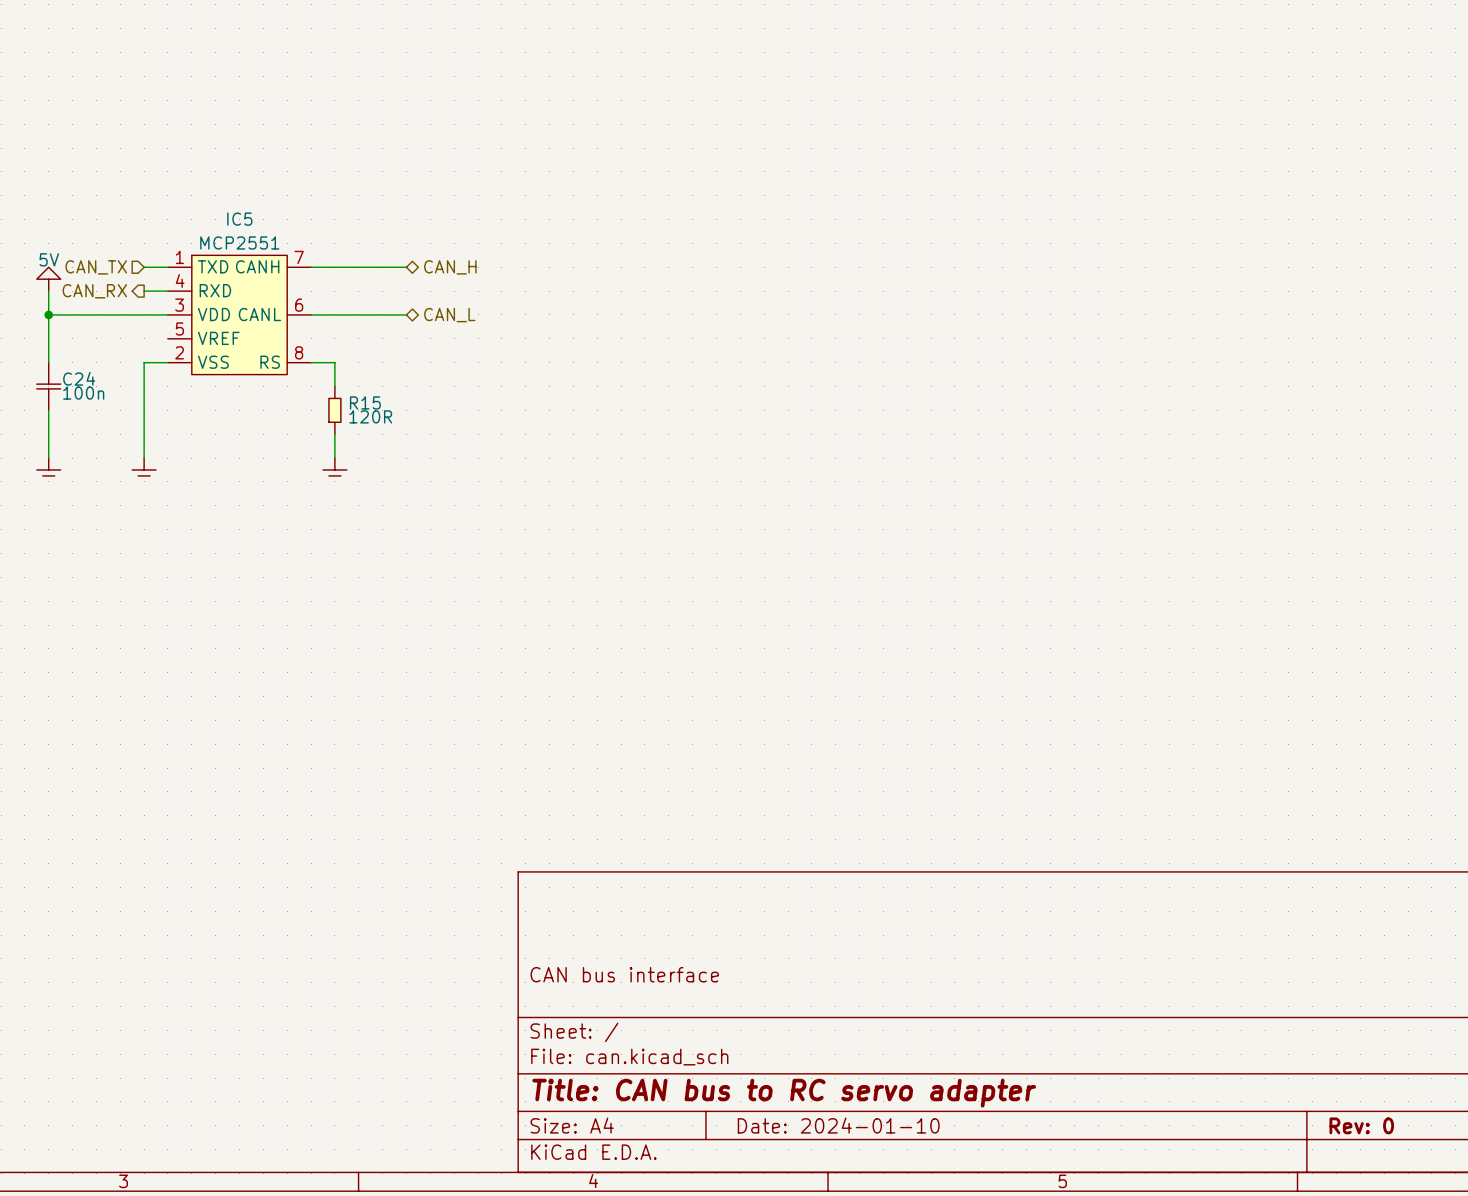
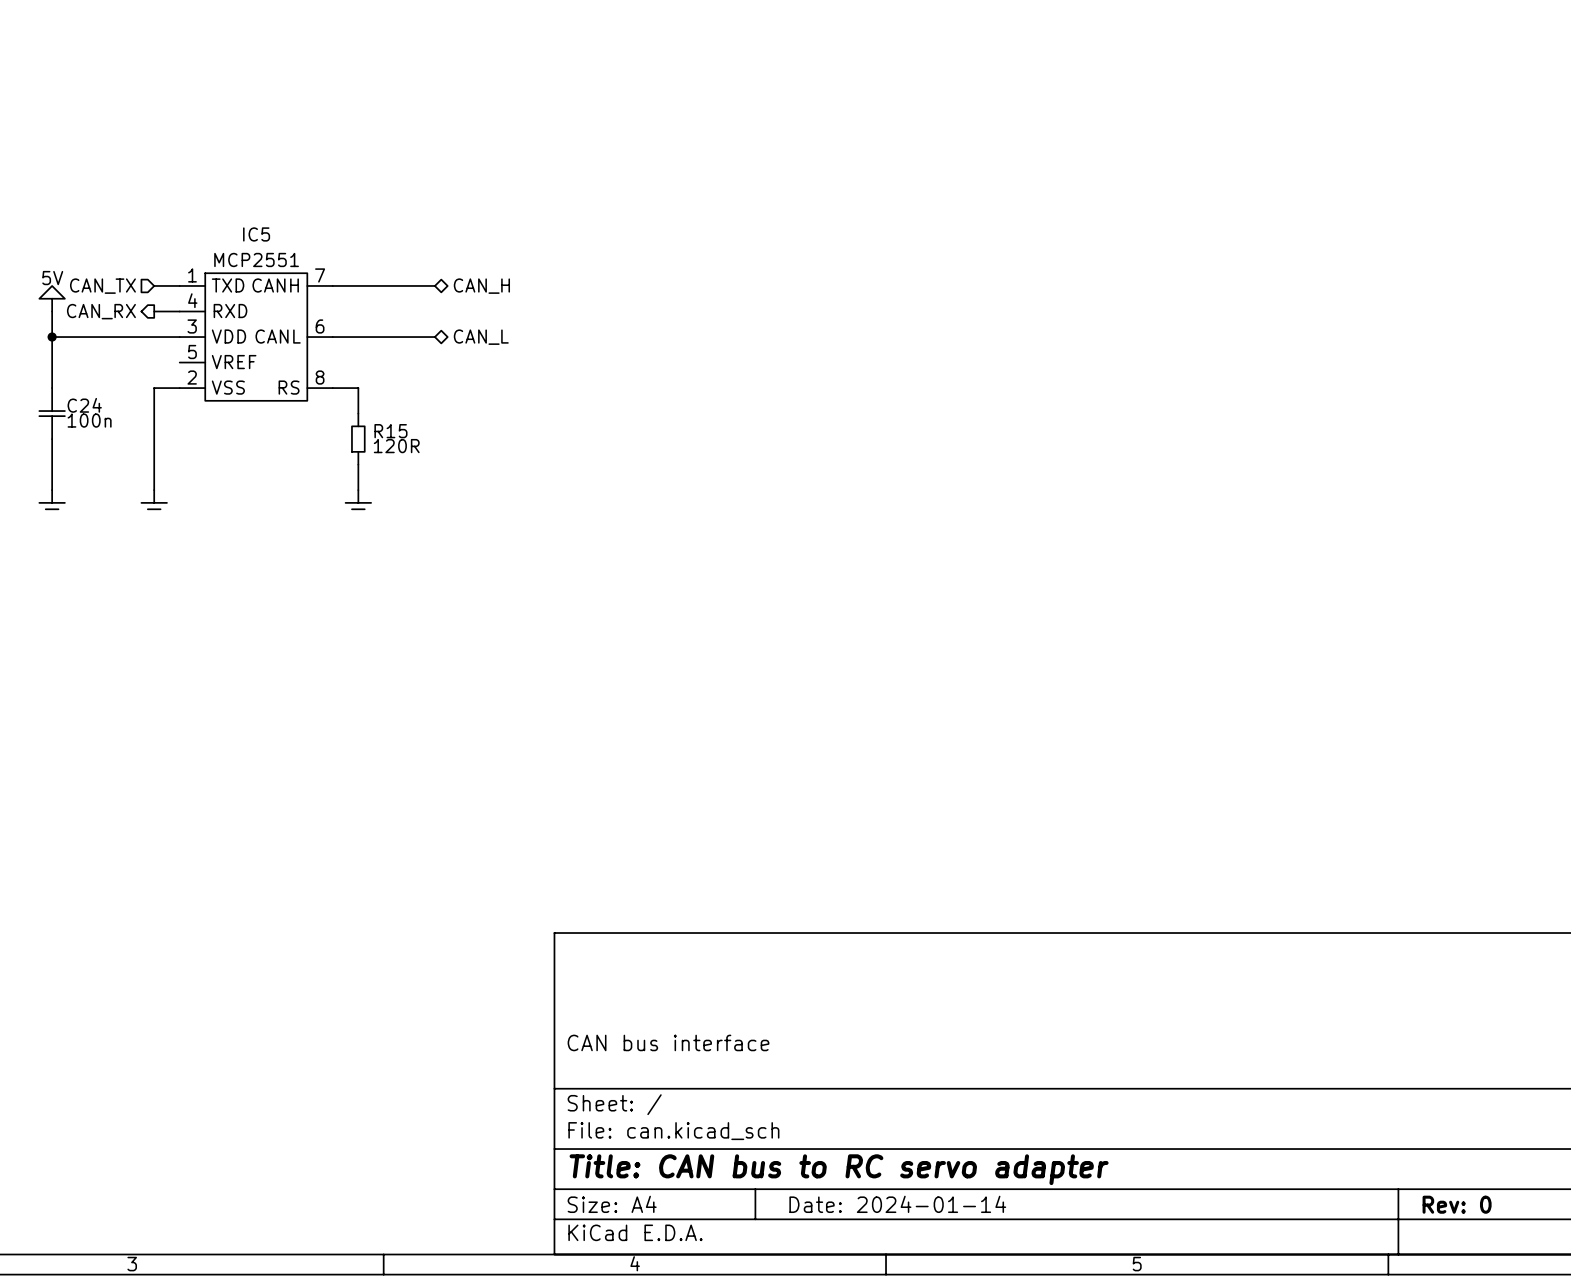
title block: Date: 2024-01-10 (838, 1125) -> Date: 2024-01-14 (897, 1204)

